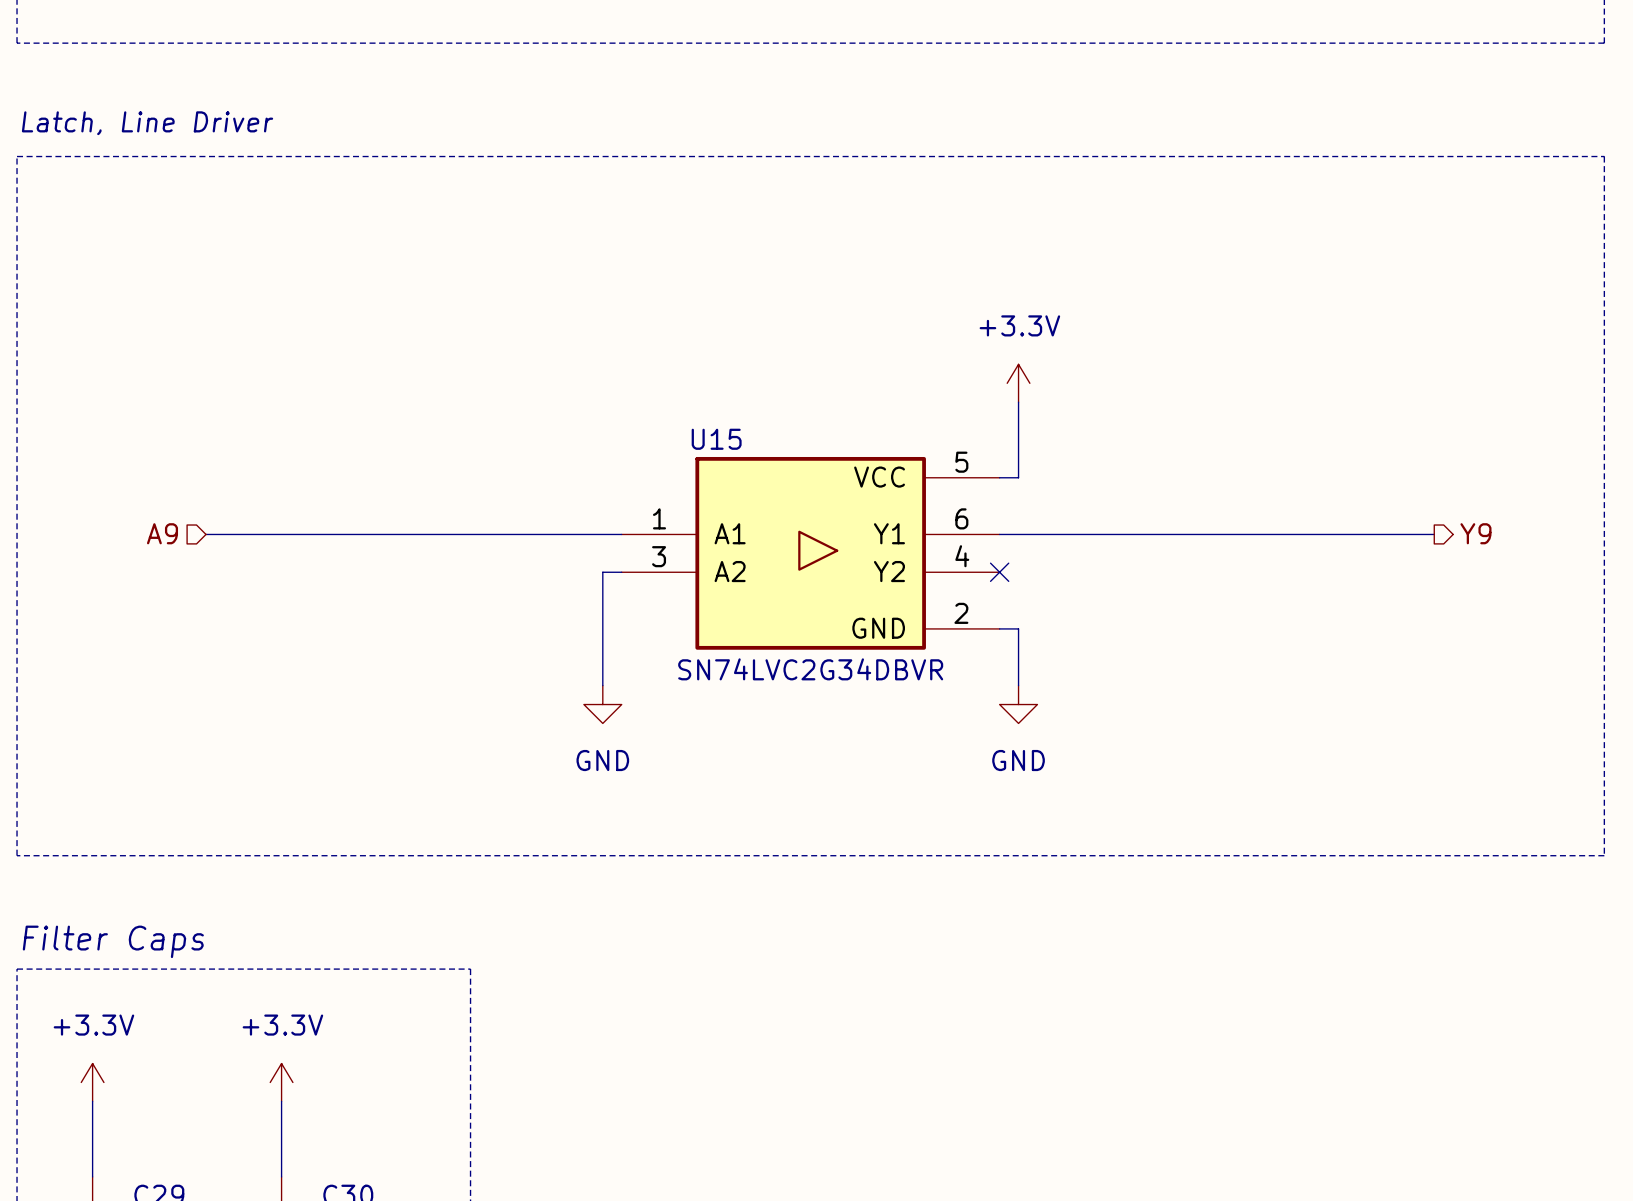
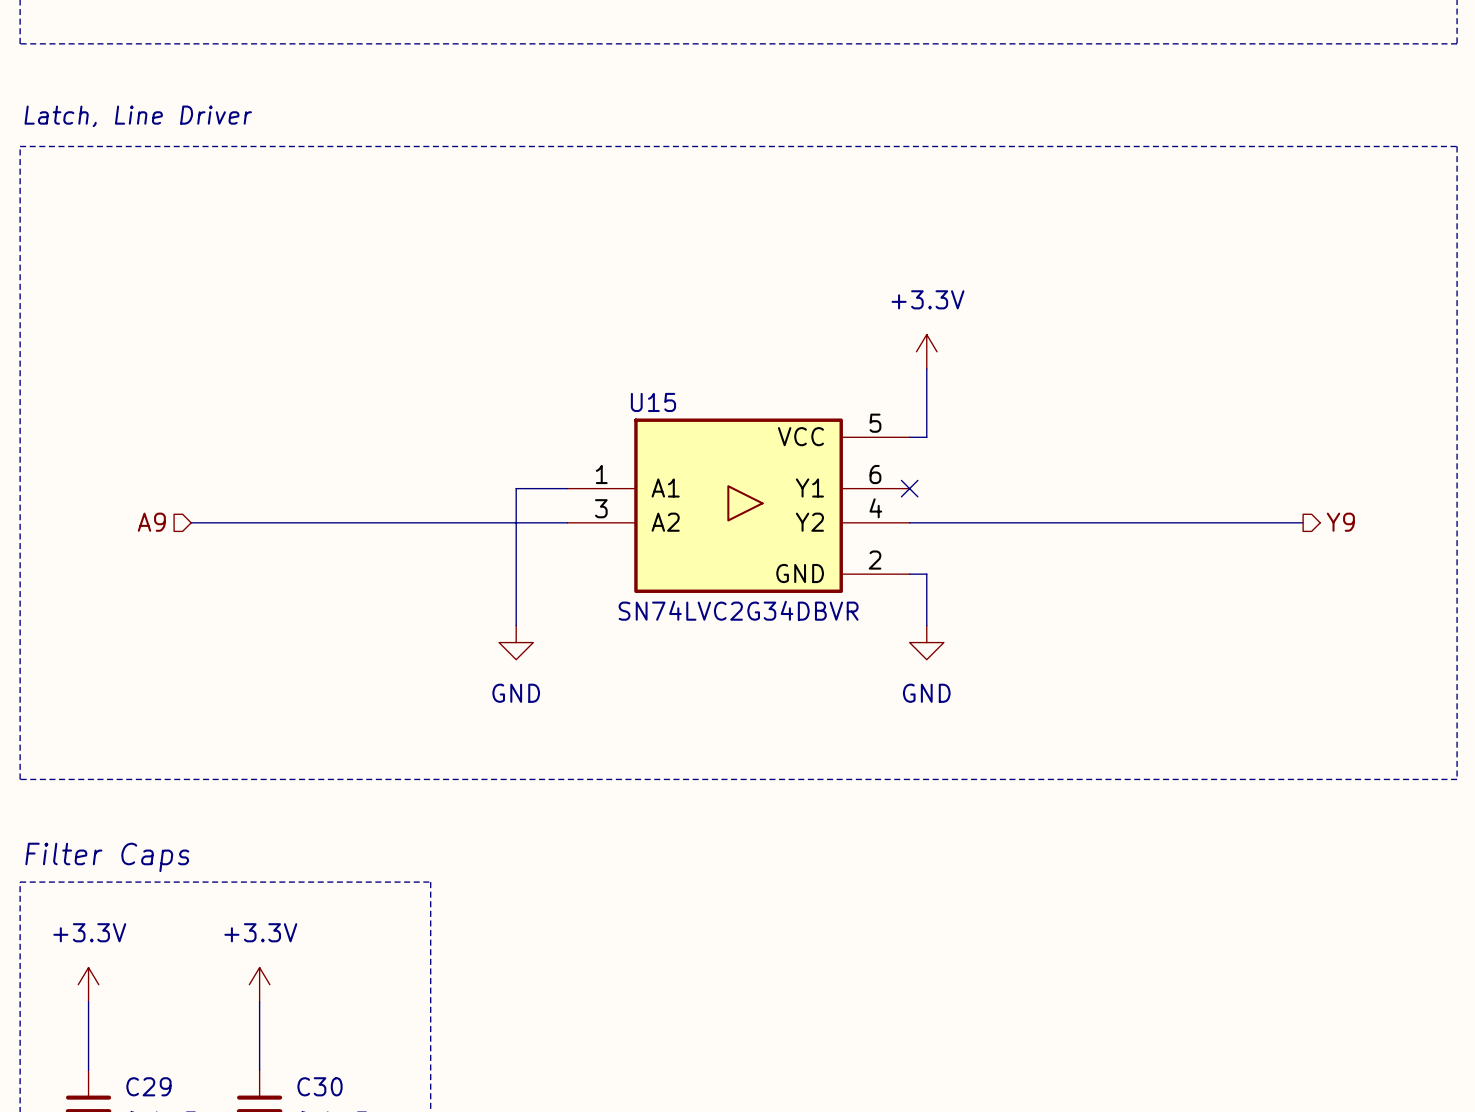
hierarchical label position: A9 (162, 533) -> A9 (151, 522)
hierarchical label position: Y9 (1475, 533) -> Y9 (1340, 522)
wire: (205, 534) (565, 534) -> (516, 625) (516, 488)
wire: (999, 534) (1434, 534) -> (909, 522) (1303, 522)
wire: (602, 572) (602, 685) -> (550, 522) (191, 522)
no-connect mark position: (999, 572) -> (909, 488)
power symbol position: GND (602, 704) -> GND (516, 642)

